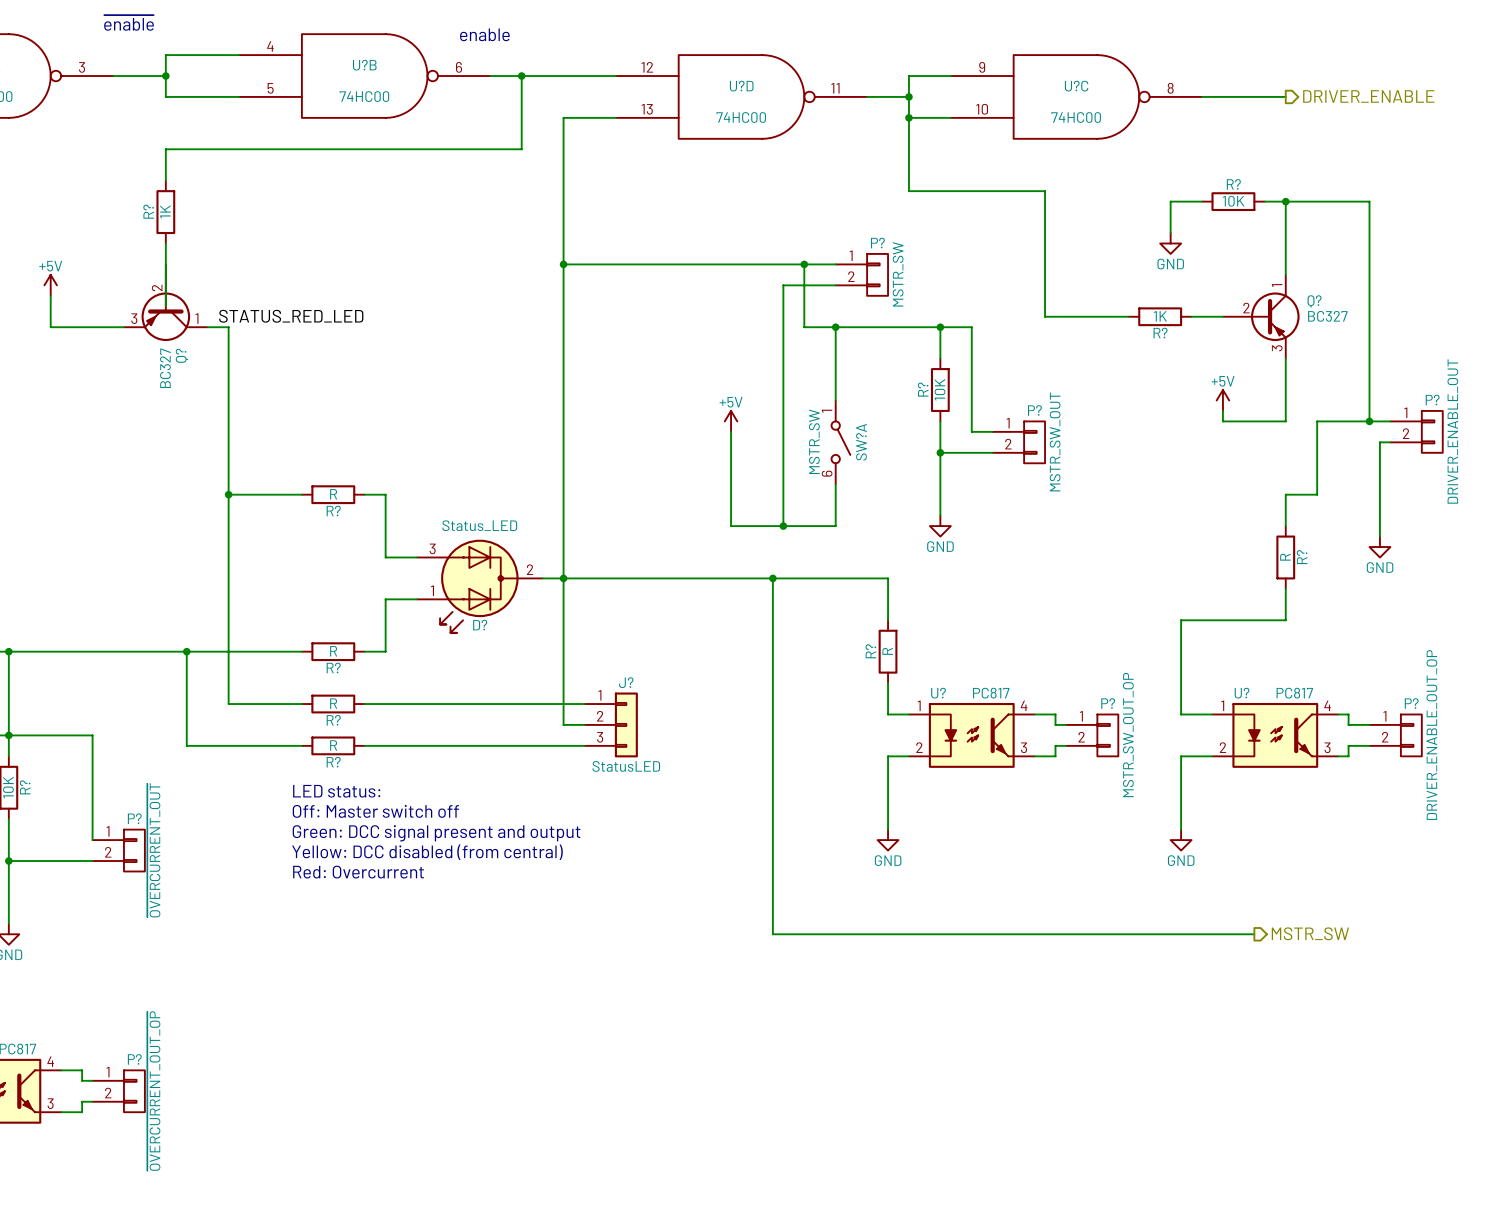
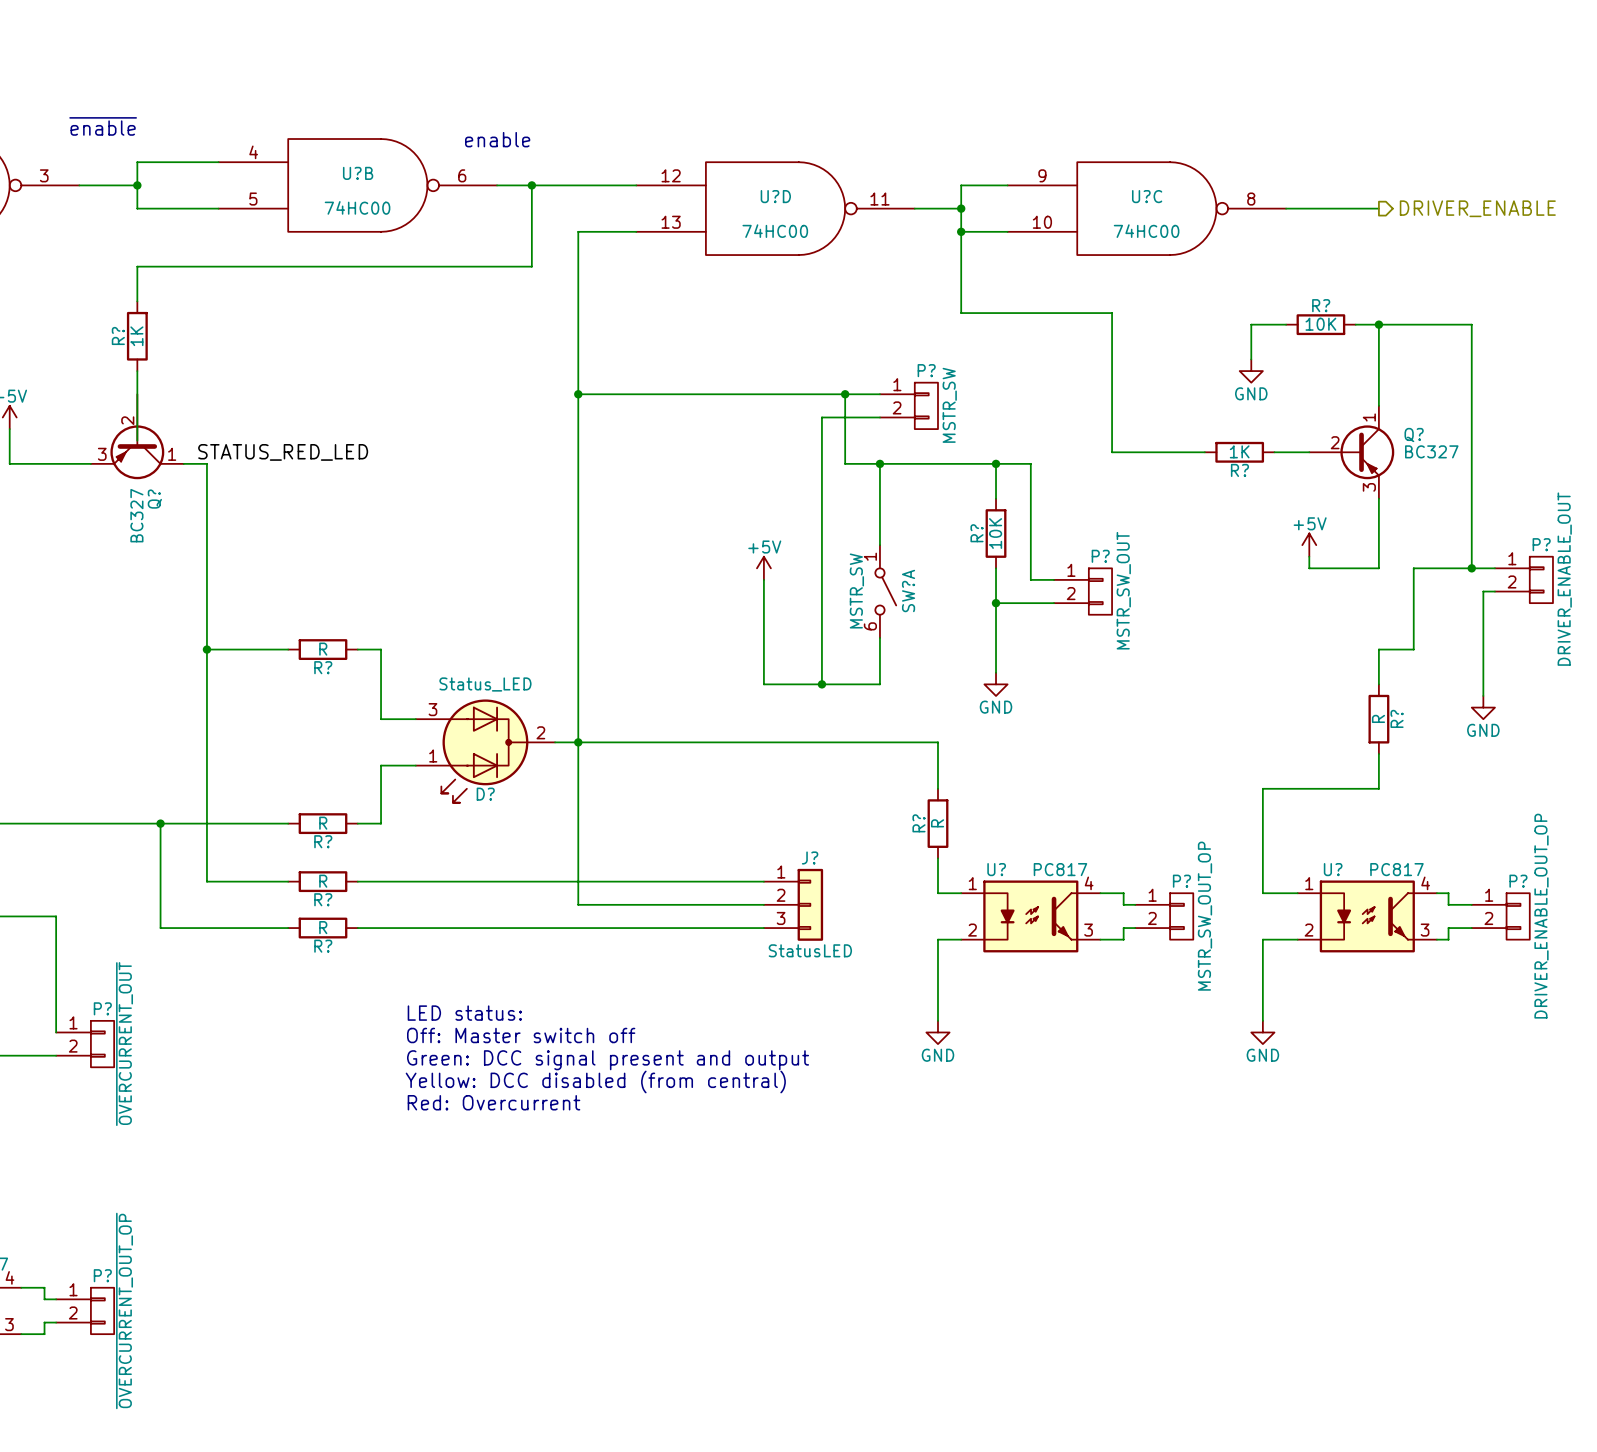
wire: (772, 578) (772, 934) (1254, 934) -> none
junction: (772, 578) -> none
wire: none -> (601, 881) (763, 881)
wire: none -> (601, 904) (763, 904)
J? position: (611, 724) -> (793, 904)
wire: none -> (601, 928) (763, 928)
text position: LED status: (336, 791) -> LED status: (464, 1013)
text position: Off: Master switch off (375, 811) -> Off: Master switch off (521, 1035)
text position: Green: DCC signal present and output (436, 833) -> Green: DCC signal present and output (608, 1060)
text position: Yellow: DCC disabled (from central) (427, 852) -> Yellow: DCC disabled (from central) (595, 1081)
text position: Red: Overcurrent (358, 872) -> Red: Overcurrent (493, 1102)
hierarchical label: MSTR_SW (1310, 933) -> none

